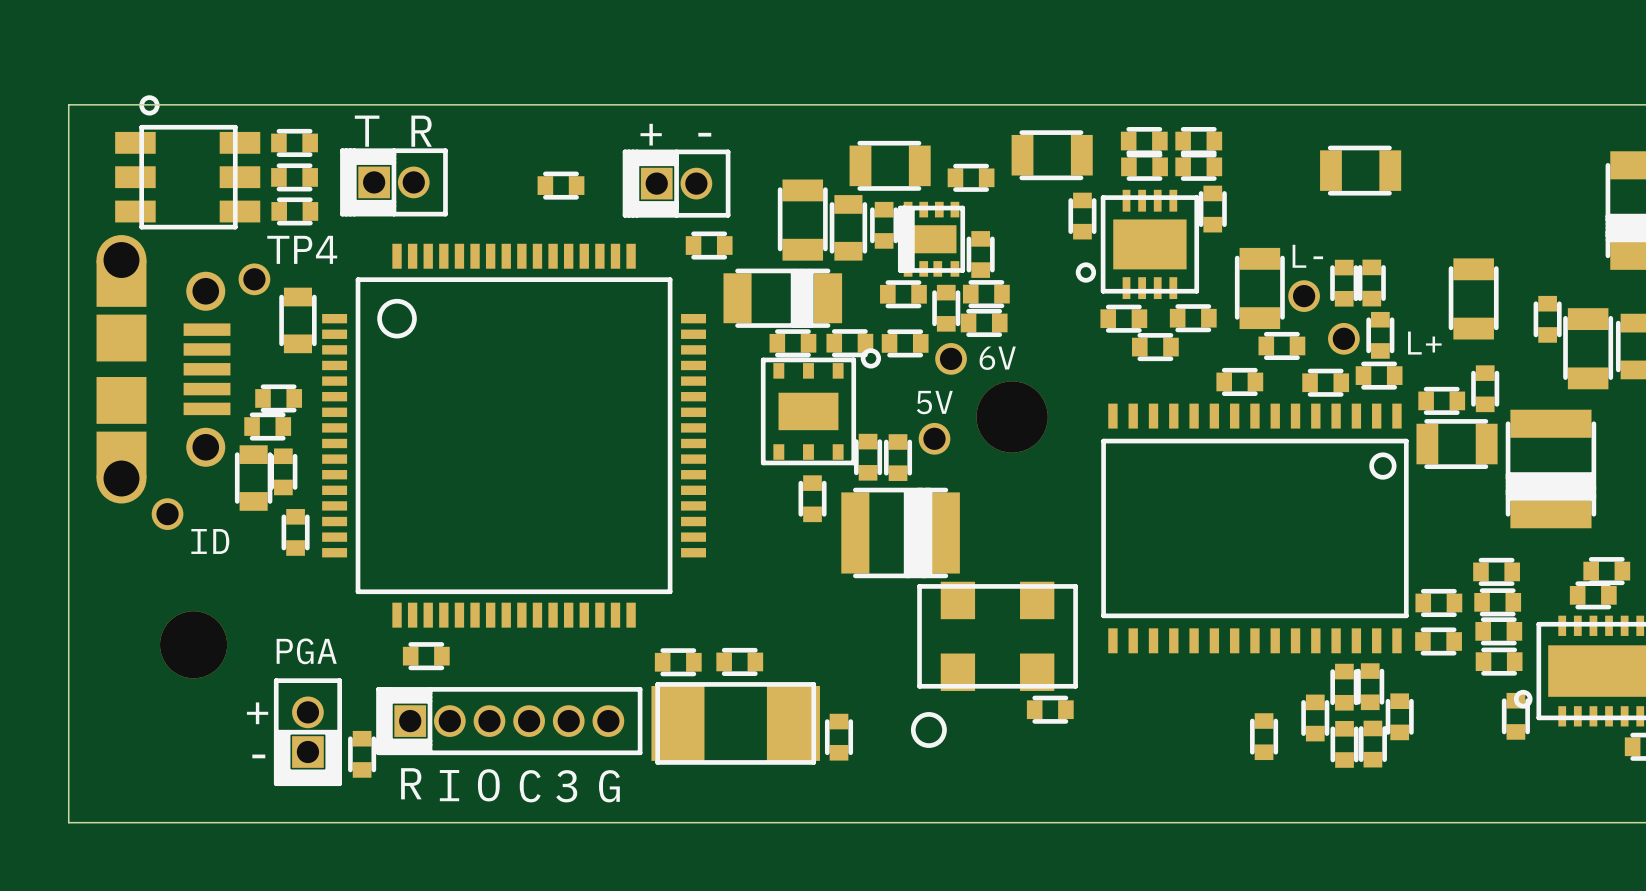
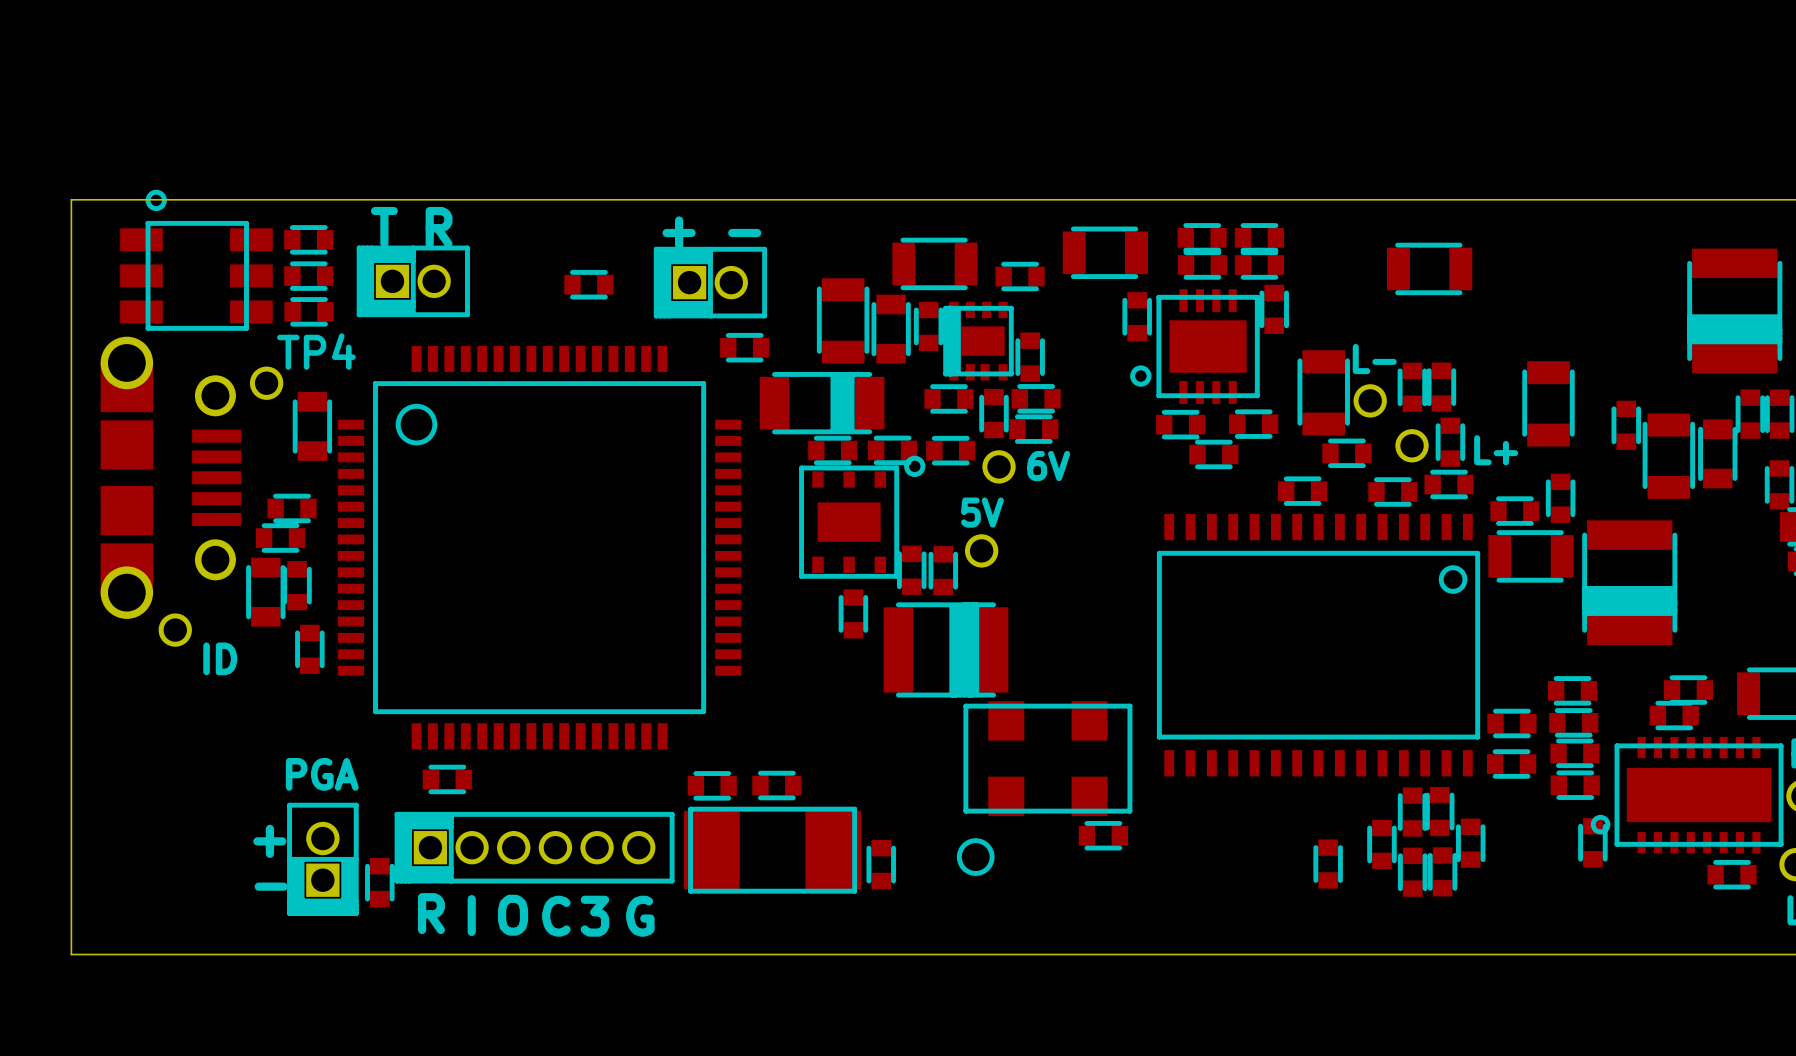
part: (1012, 416) -> none
part: (193, 644) -> none

